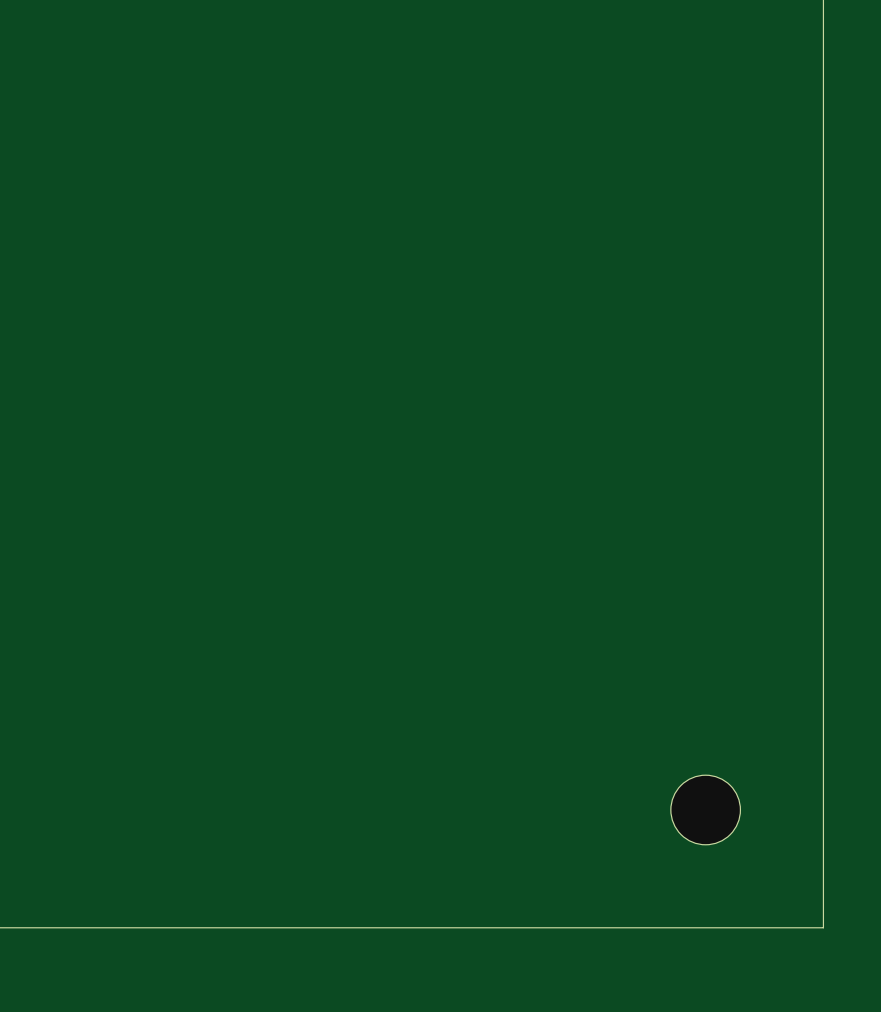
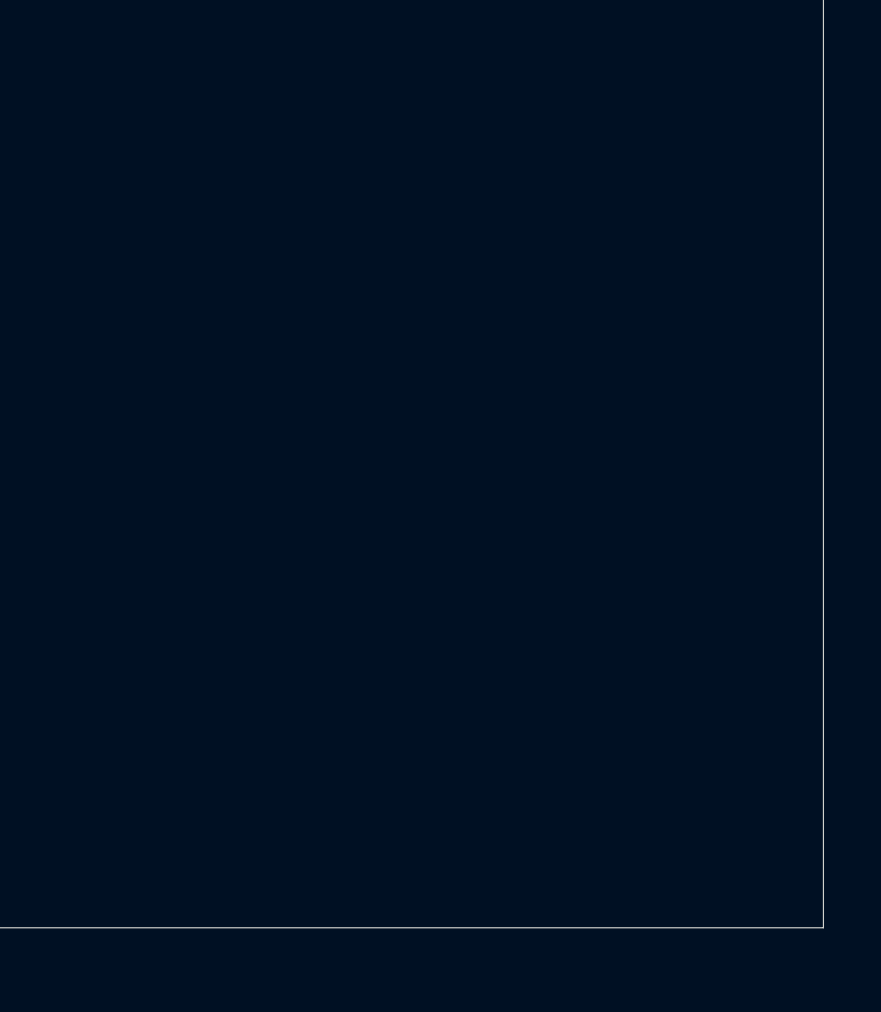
hole: (705, 809) -> none

